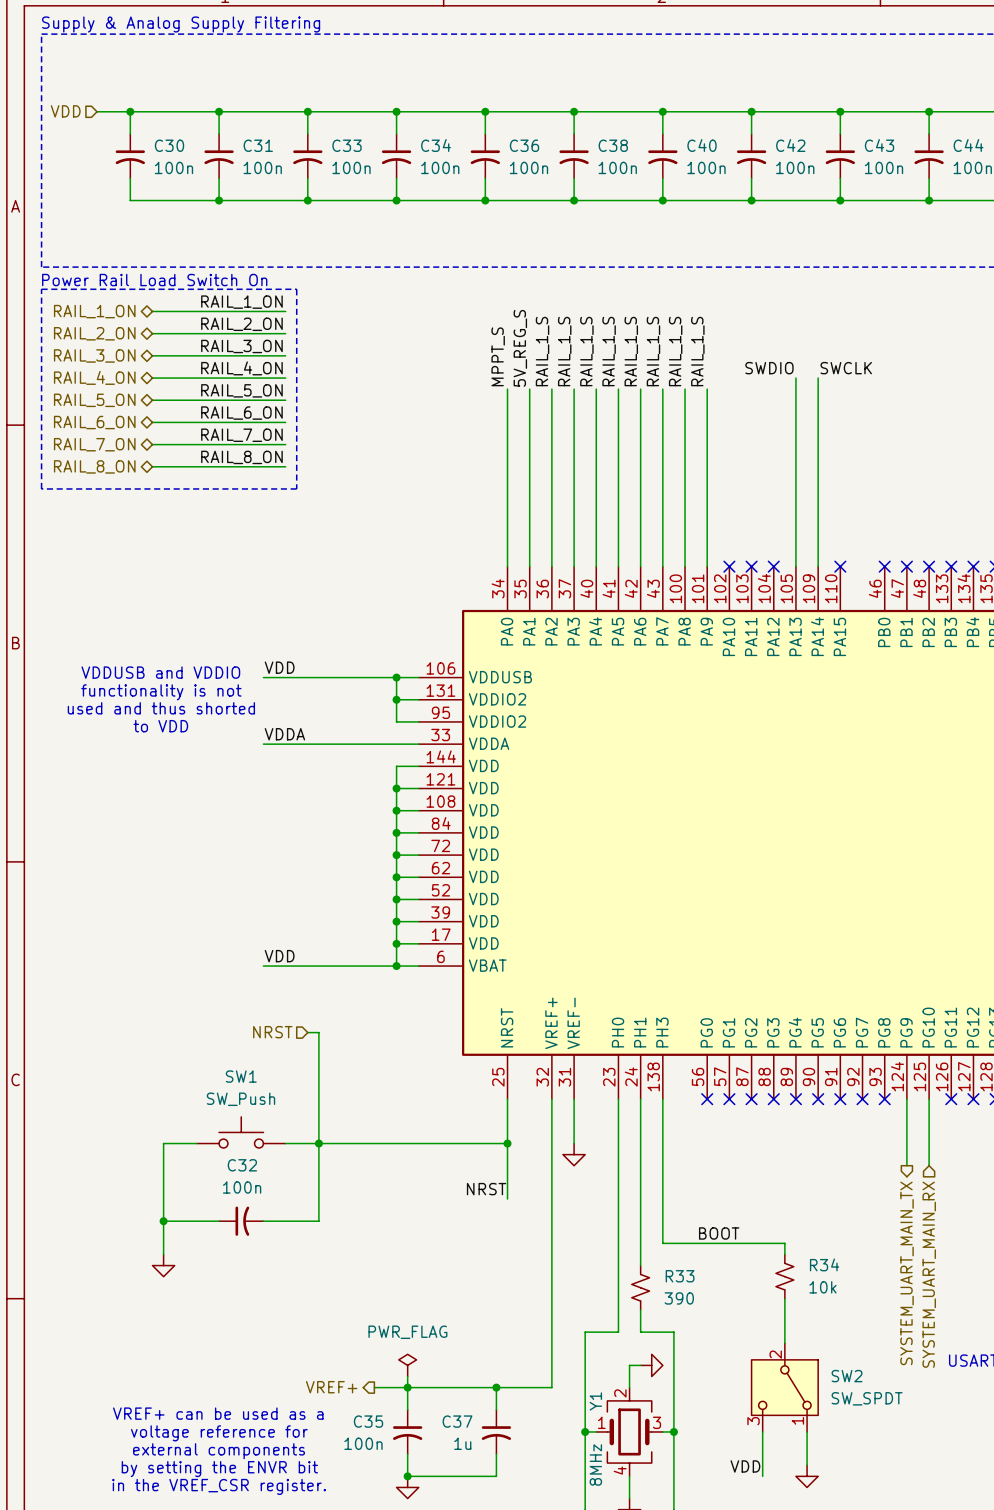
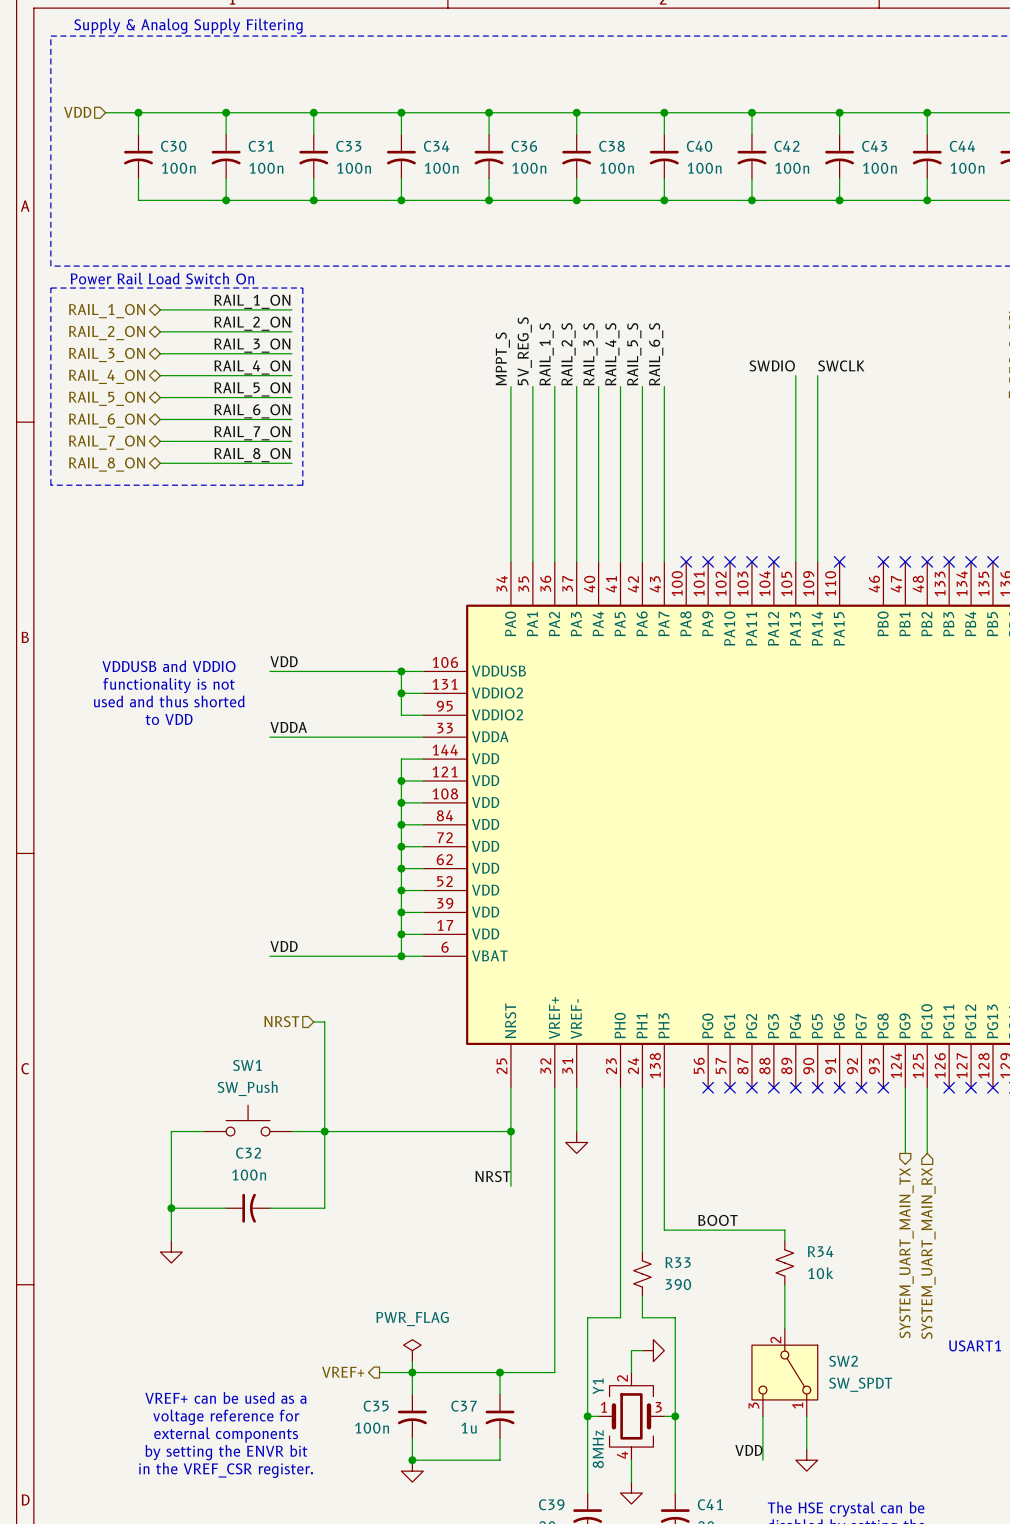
label: RAIL_1_S (564, 351) -> RAIL_2_S (568, 354)
label: RAIL_1_S (586, 351) -> RAIL_3_S (590, 354)
label: RAIL_1_S (609, 351) -> RAIL_4_S (612, 354)
label: RAIL_1_S (631, 351) -> RAIL_5_S (634, 354)
label: RAIL_1_S (653, 351) -> RAIL_6_S (656, 354)
label: RAIL_1_S (675, 351) -> none
label: RAIL_1_S (697, 351) -> none
wire: (685, 389) (685, 566) -> none
wire: (707, 389) (707, 566) -> none
no-connect mark: none -> (686, 561)
no-connect mark: none -> (708, 561)

